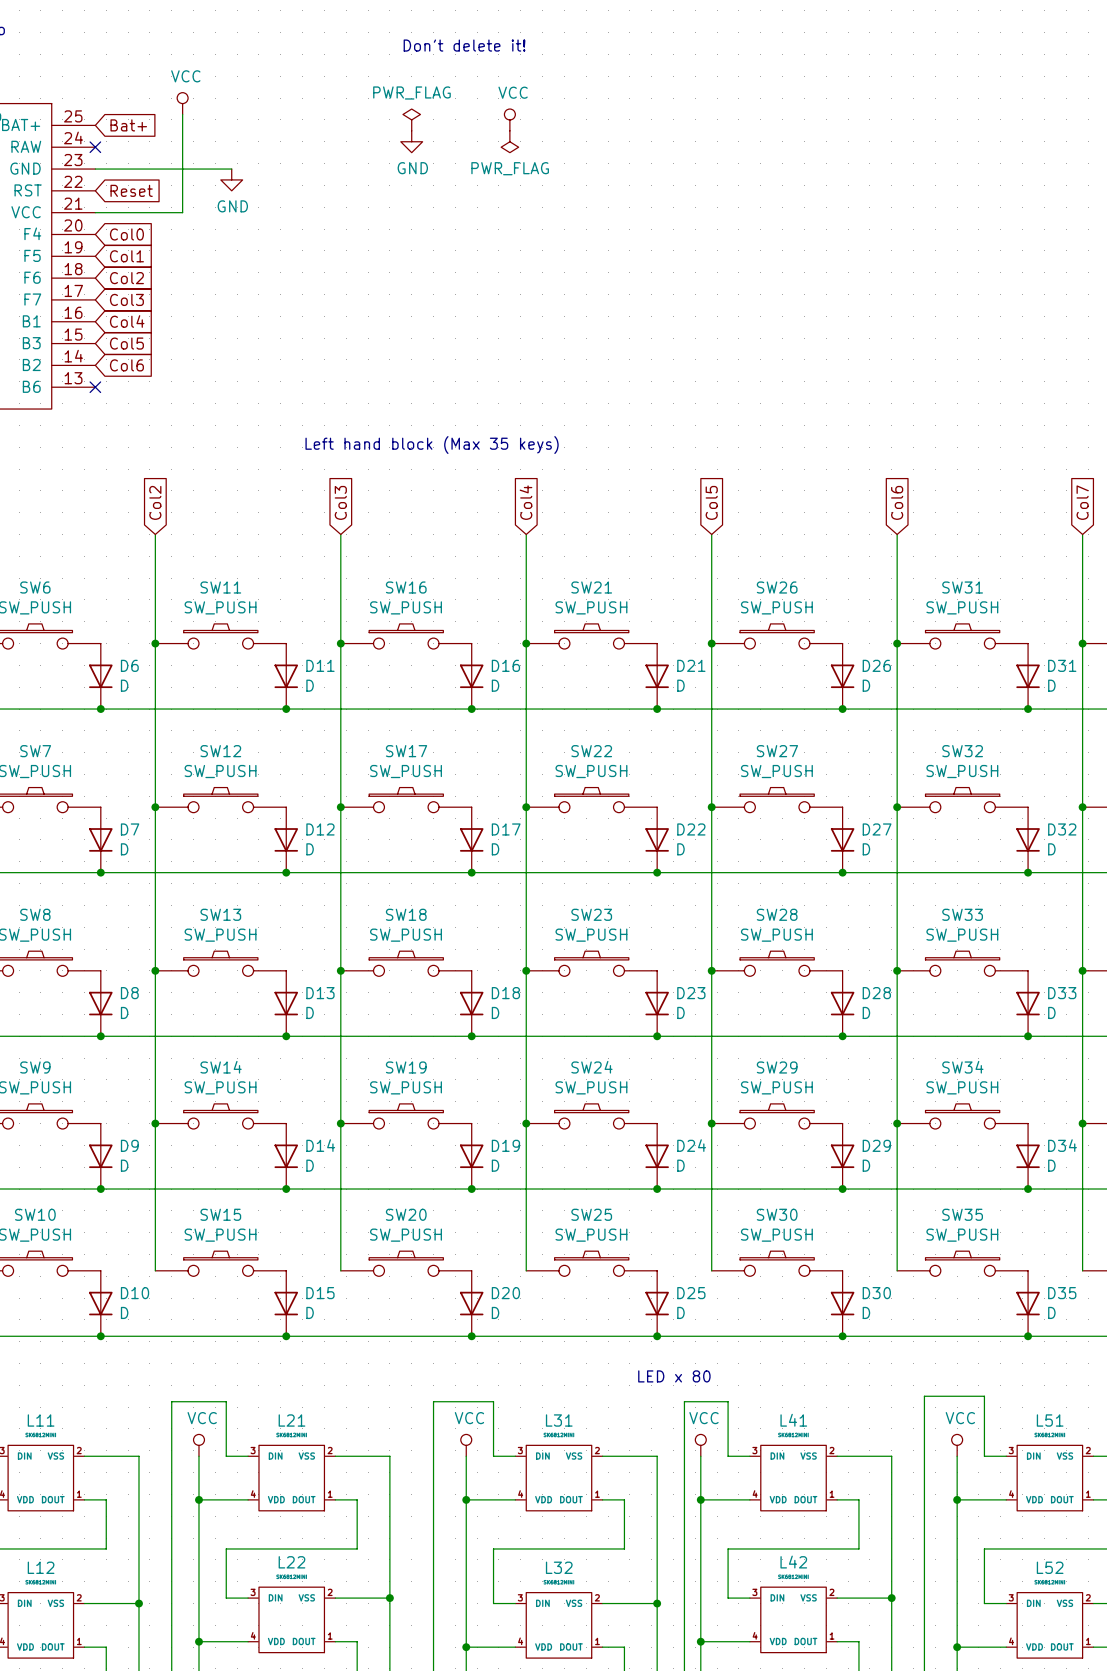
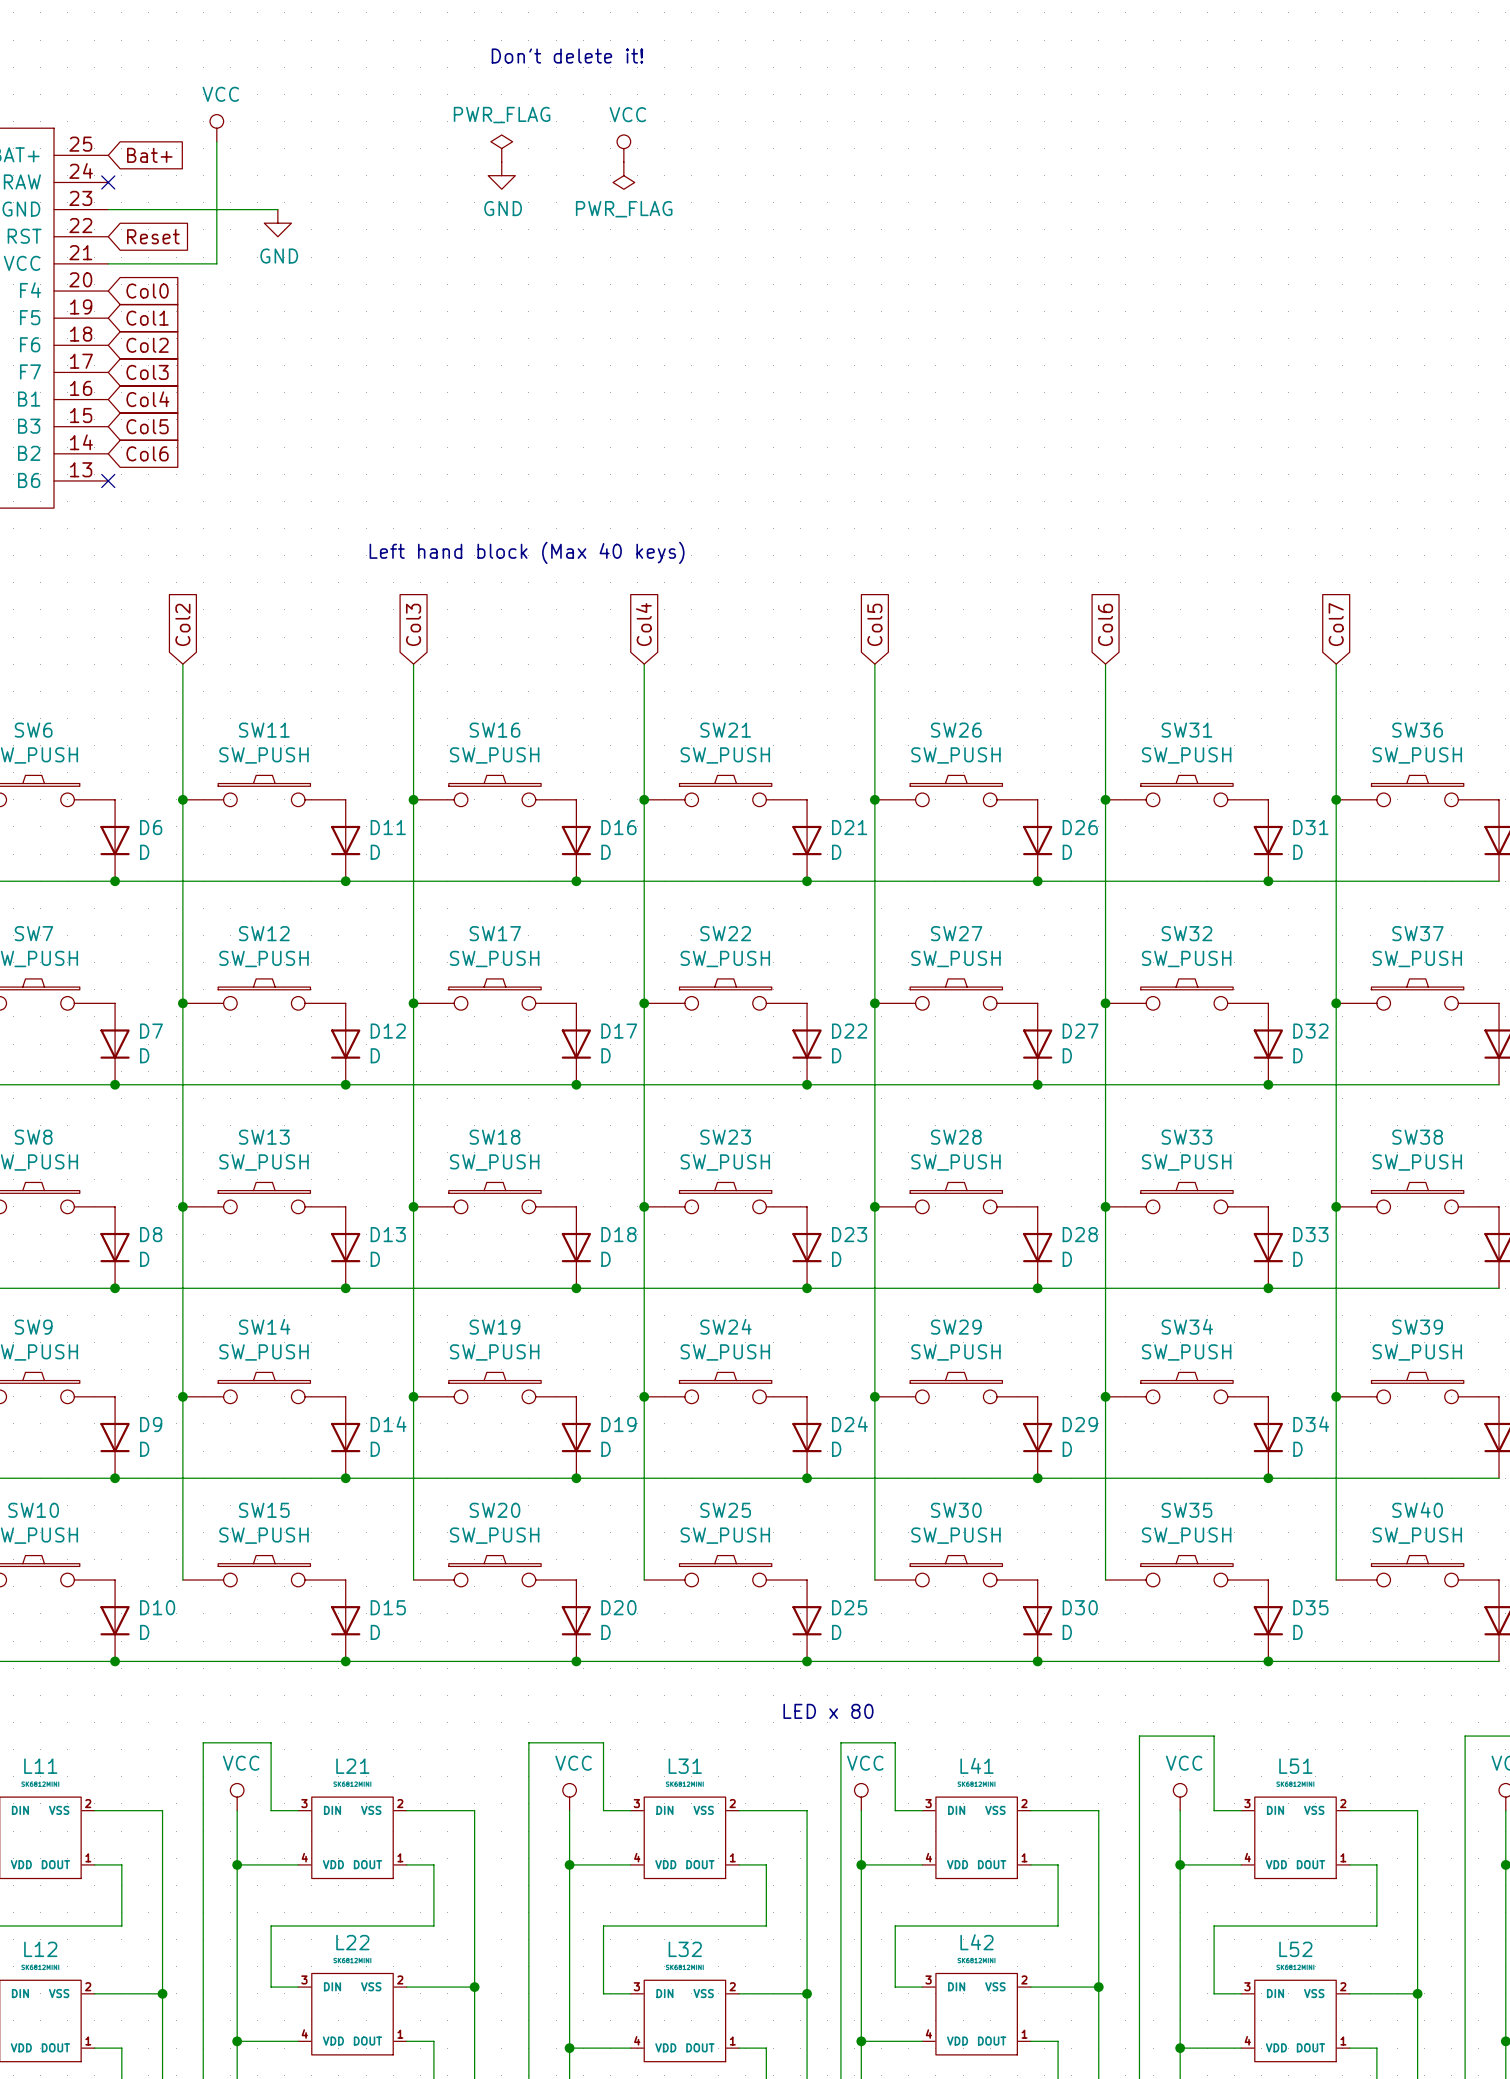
text: Left hand block (Max 35 keys) (432, 445) -> Left hand block (Max 40 keys) (527, 552)

